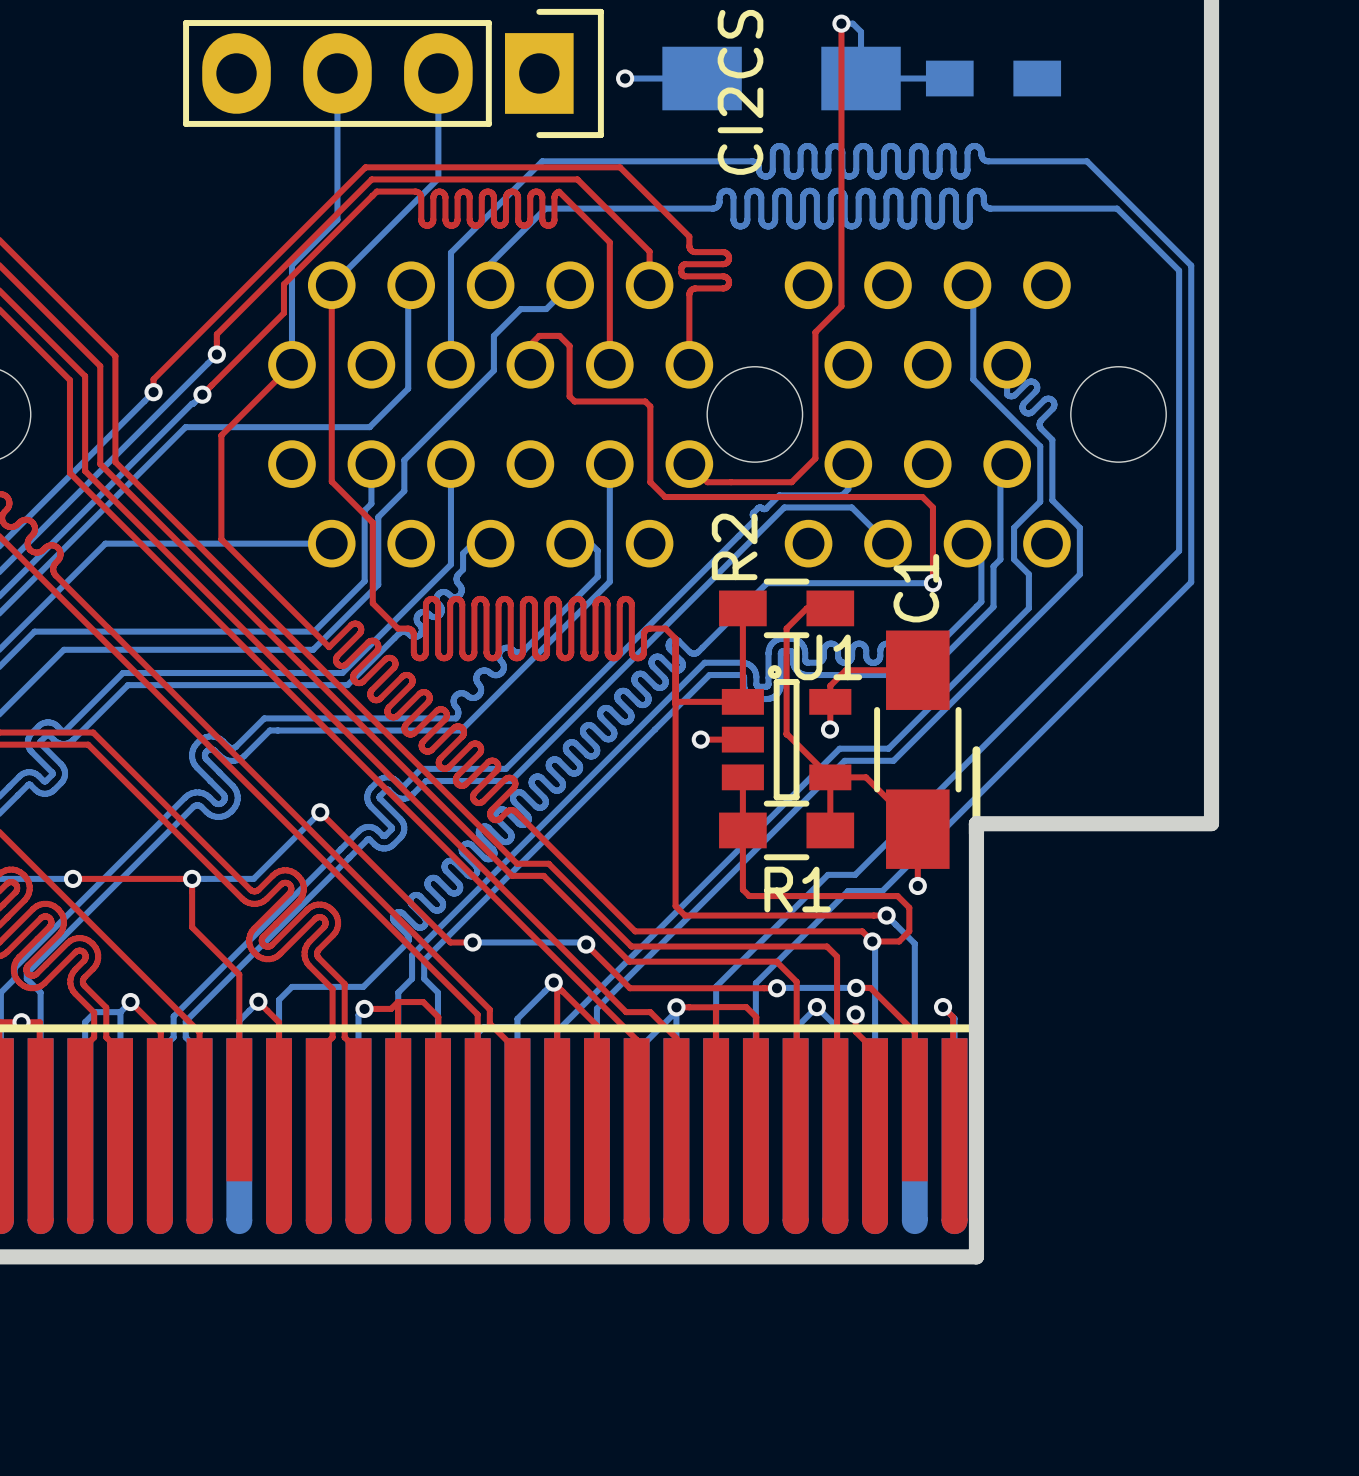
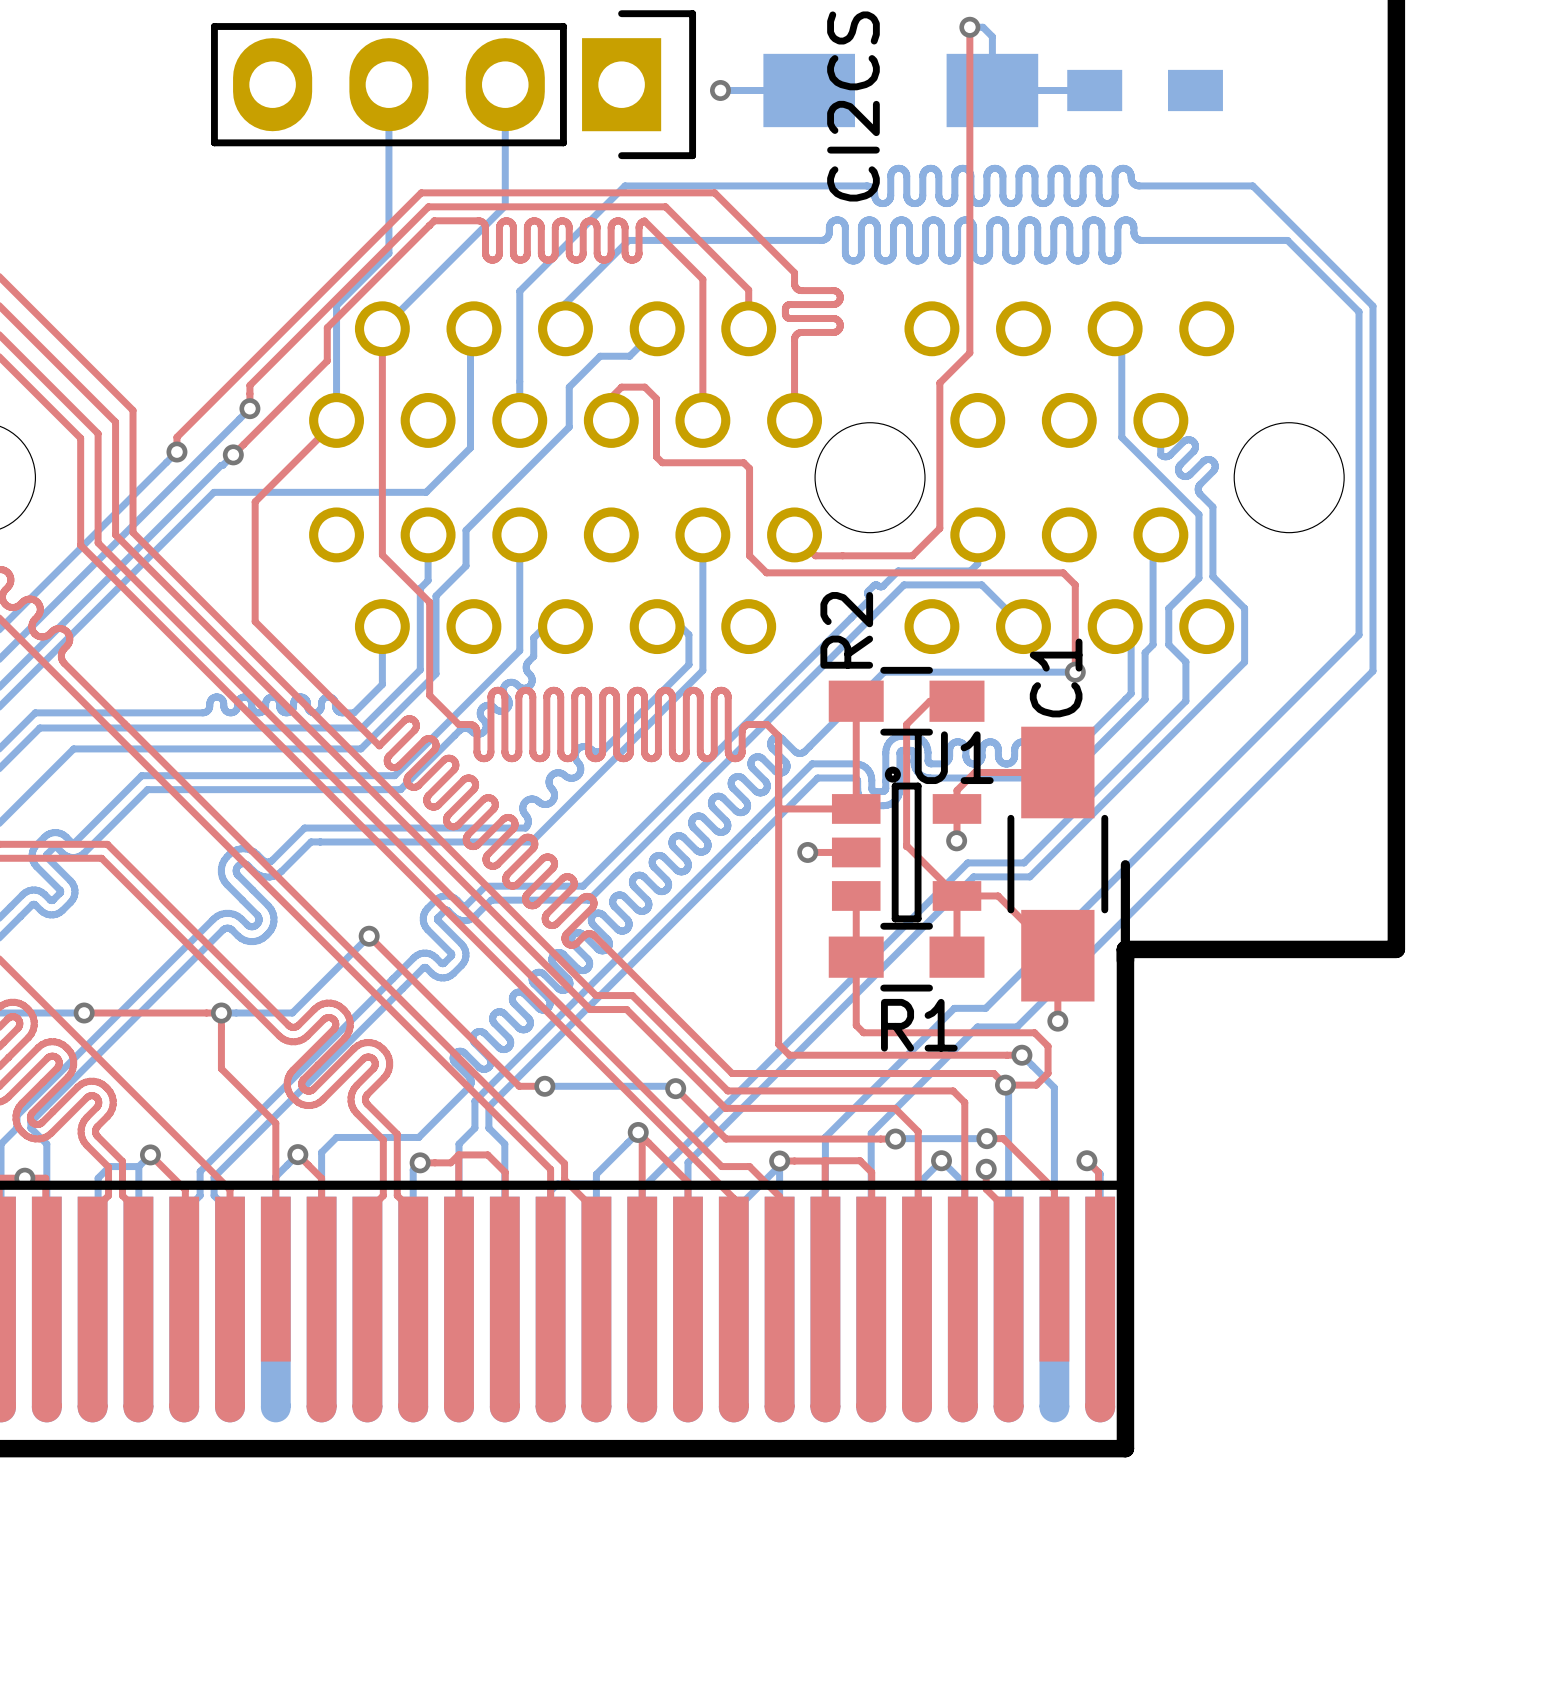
bottom track: (331, 543) (105, 543) (30, 618) -> (382, 626) (382, 684) (354, 712) (339, 712) (336, 708) (333, 699) (328, 696) (322, 699) (319, 710) (314, 712) (309, 710) (305, 699) (300, 696) (295, 699) (292, 710) (286, 712) (281, 710) (278, 699) (272, 696) (267, 699) (264, 710) (258, 712) (253, 710) (250, 699) (244, 696) (239, 699) (236, 710) (230, 712) (225, 710) (222, 699) (216, 696) (211, 699) (208, 710) (202, 712) (35, 712)

